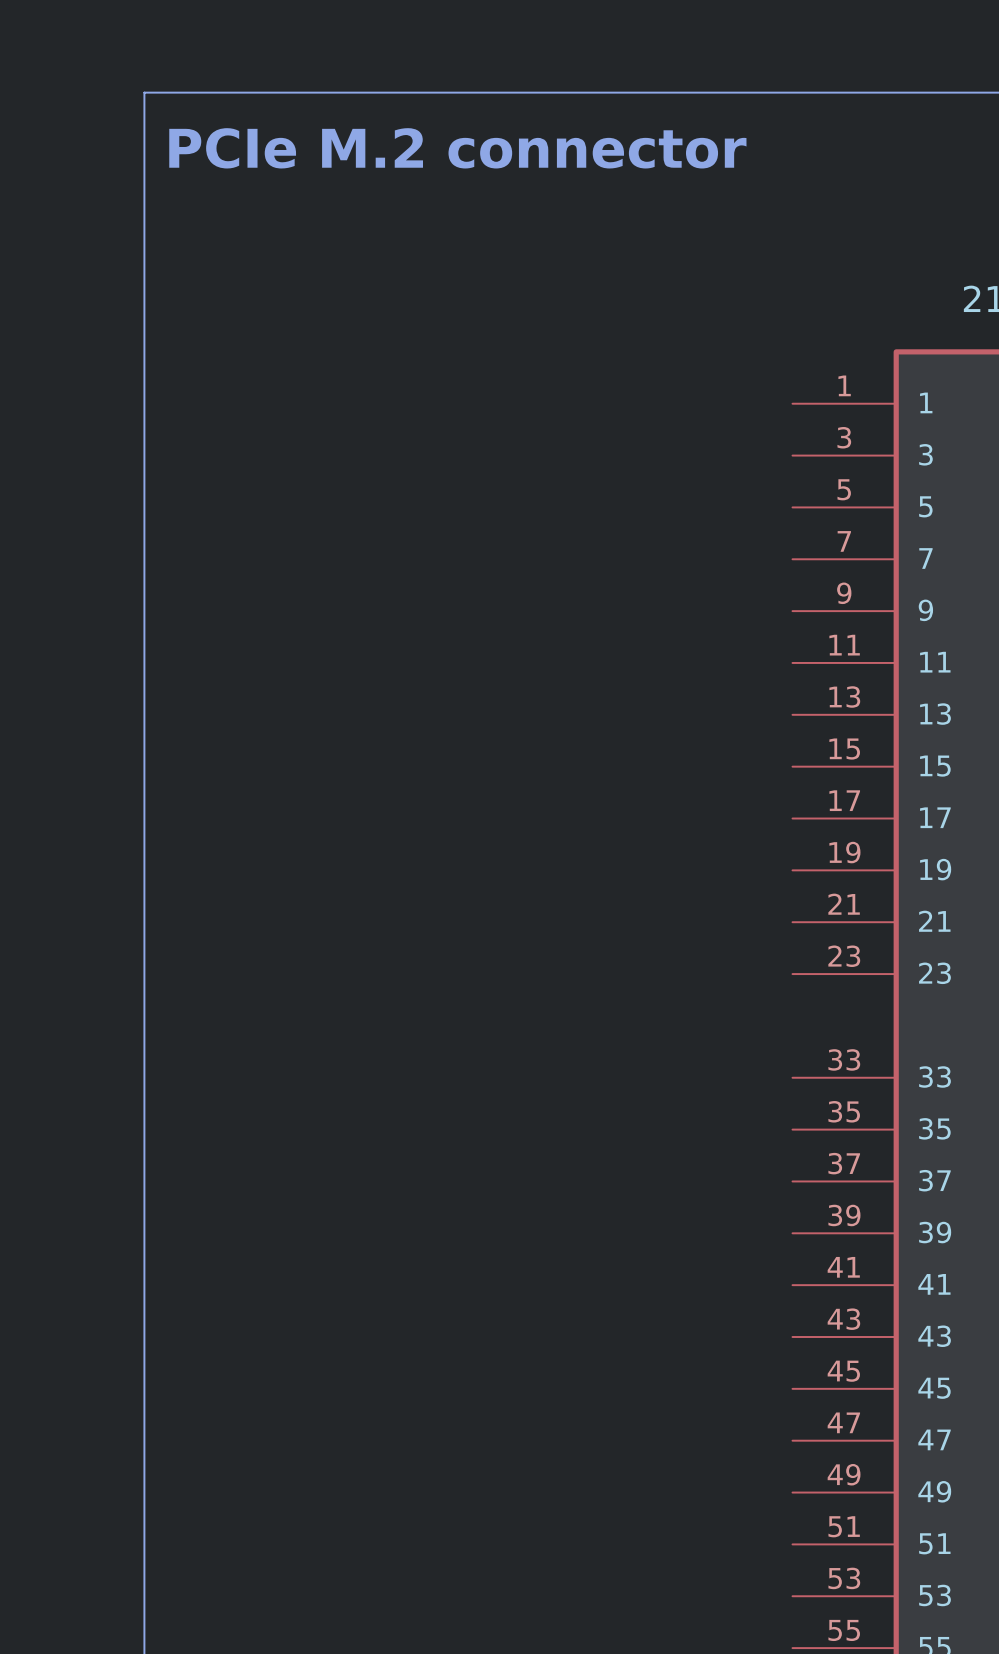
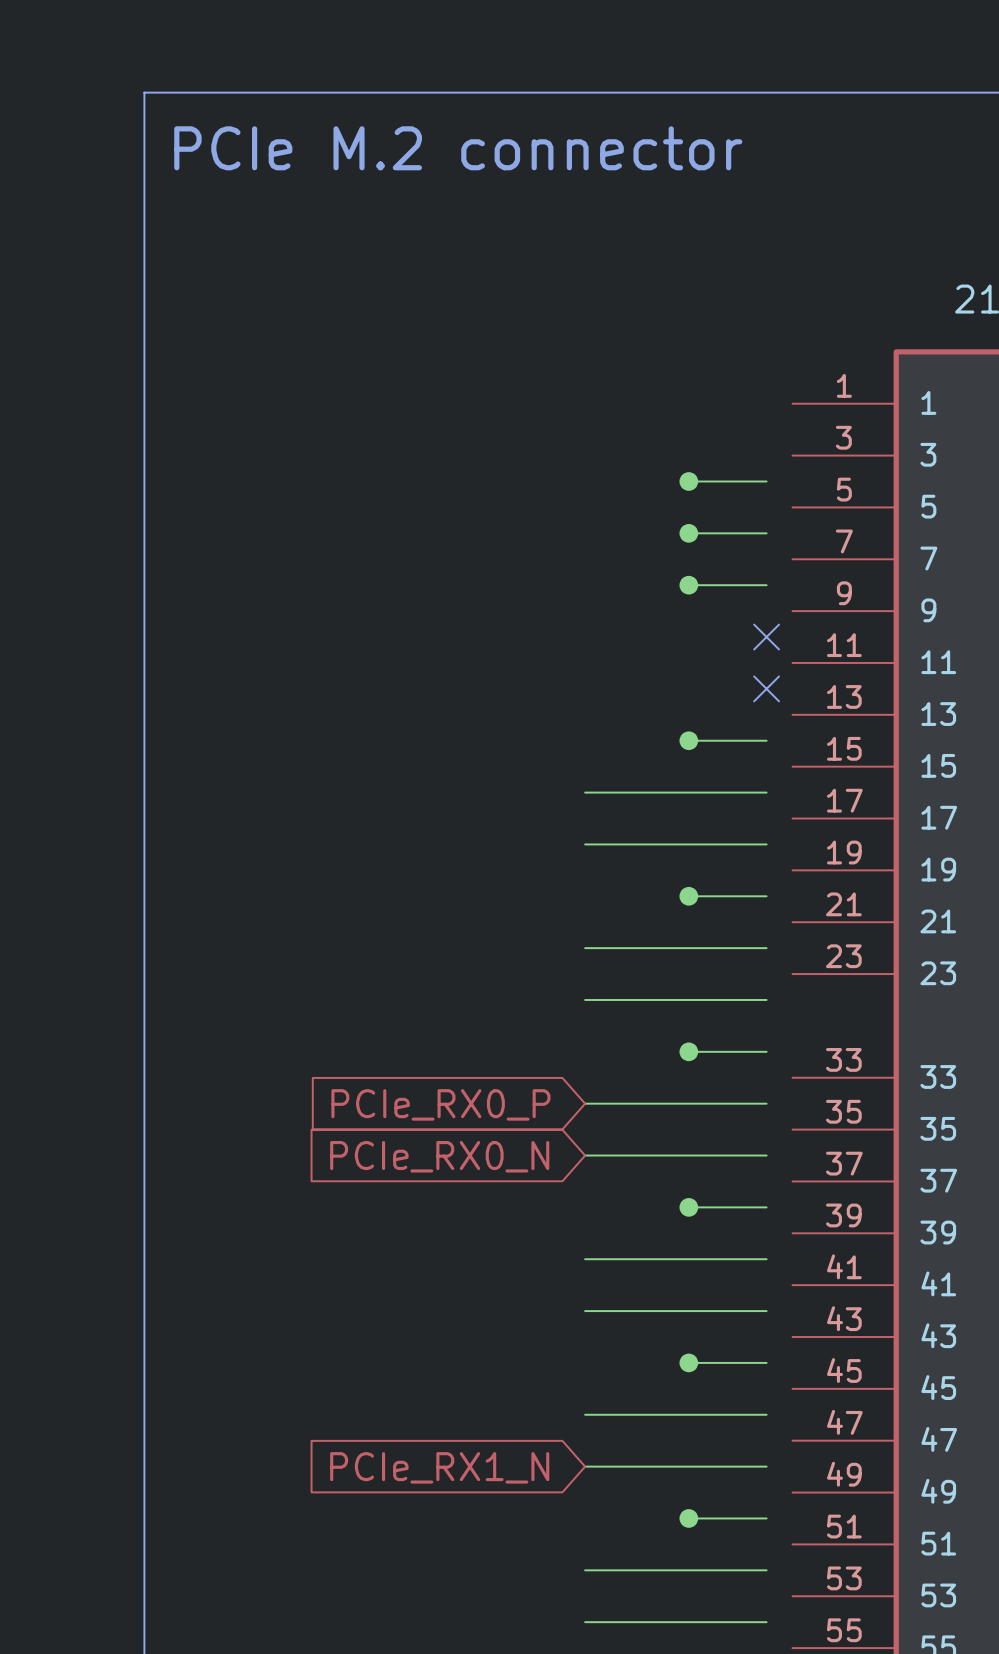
wire: none -> (688, 481) (766, 481)
junction: none -> (688, 481)
wire: none -> (688, 533) (766, 533)
junction: none -> (688, 533)
wire: none -> (688, 585) (766, 585)
junction: none -> (688, 585)
no-connect mark: none -> (766, 637)
no-connect mark: none -> (766, 688)
wire: none -> (688, 740) (766, 740)
junction: none -> (688, 740)
wire: none -> (585, 792) (766, 792)
wire: none -> (585, 844) (766, 844)
wire: none -> (688, 896) (766, 896)
junction: none -> (688, 896)
wire: none -> (585, 948) (766, 948)
wire: none -> (585, 999) (766, 999)
wire: none -> (688, 1051) (766, 1051)
junction: none -> (688, 1051)
wire: none -> (585, 1103) (766, 1103)
global label: none -> PCIe_RX0_P (440, 1104)
wire: none -> (585, 1155) (766, 1155)
global label: none -> PCIe_RX0_N (439, 1156)
wire: none -> (688, 1207) (766, 1207)
junction: none -> (688, 1207)
wire: none -> (585, 1259) (766, 1259)
wire: none -> (585, 1311) (766, 1311)
wire: none -> (688, 1362) (766, 1362)
junction: none -> (688, 1362)
wire: none -> (585, 1414) (766, 1414)
wire: none -> (585, 1466) (766, 1466)
global label: none -> PCIe_RX1_N (439, 1467)
wire: none -> (688, 1518) (766, 1518)
junction: none -> (688, 1518)
wire: none -> (585, 1570) (766, 1570)
wire: none -> (585, 1622) (766, 1622)

